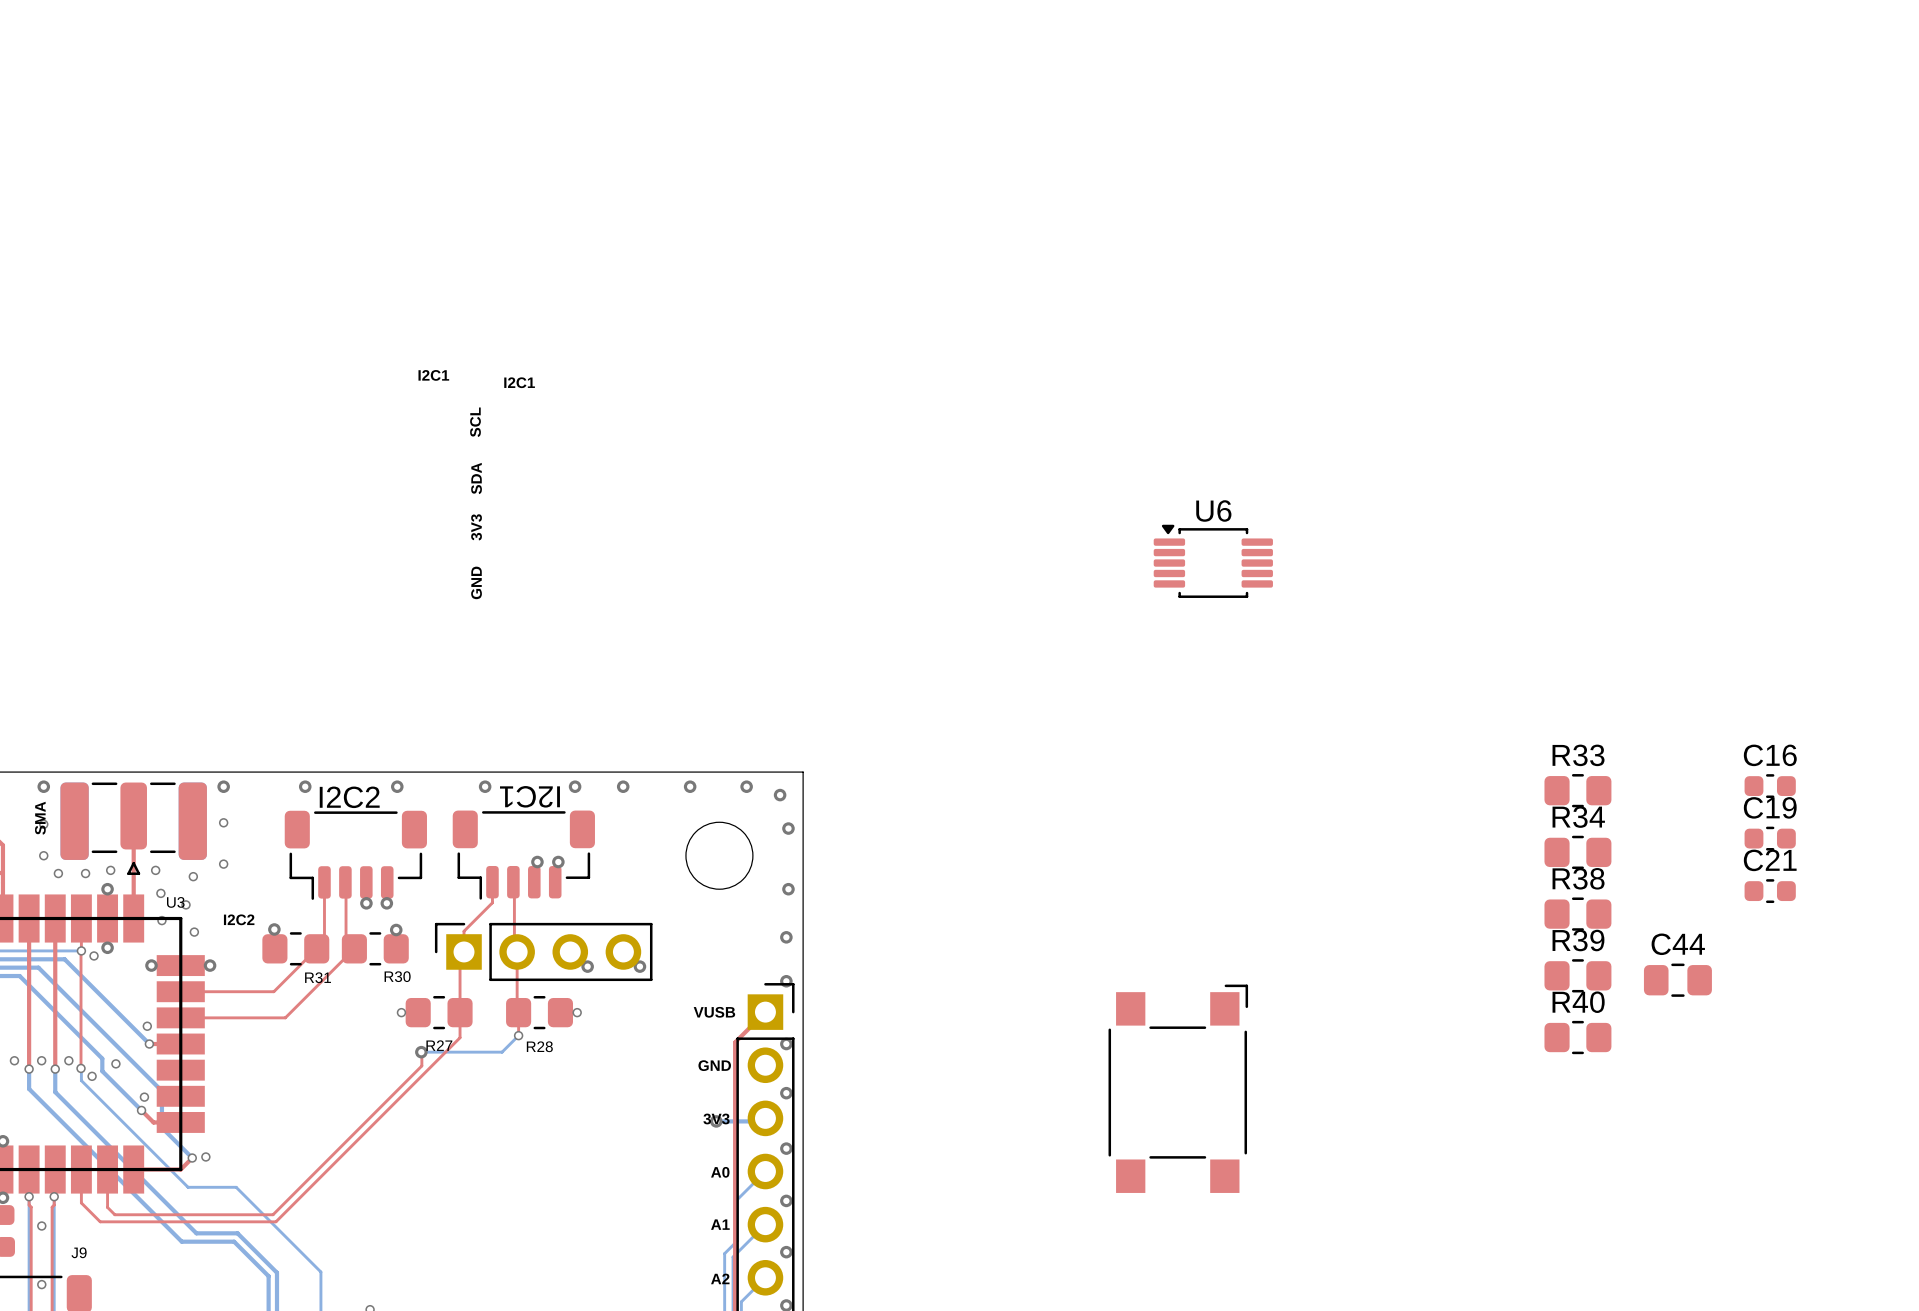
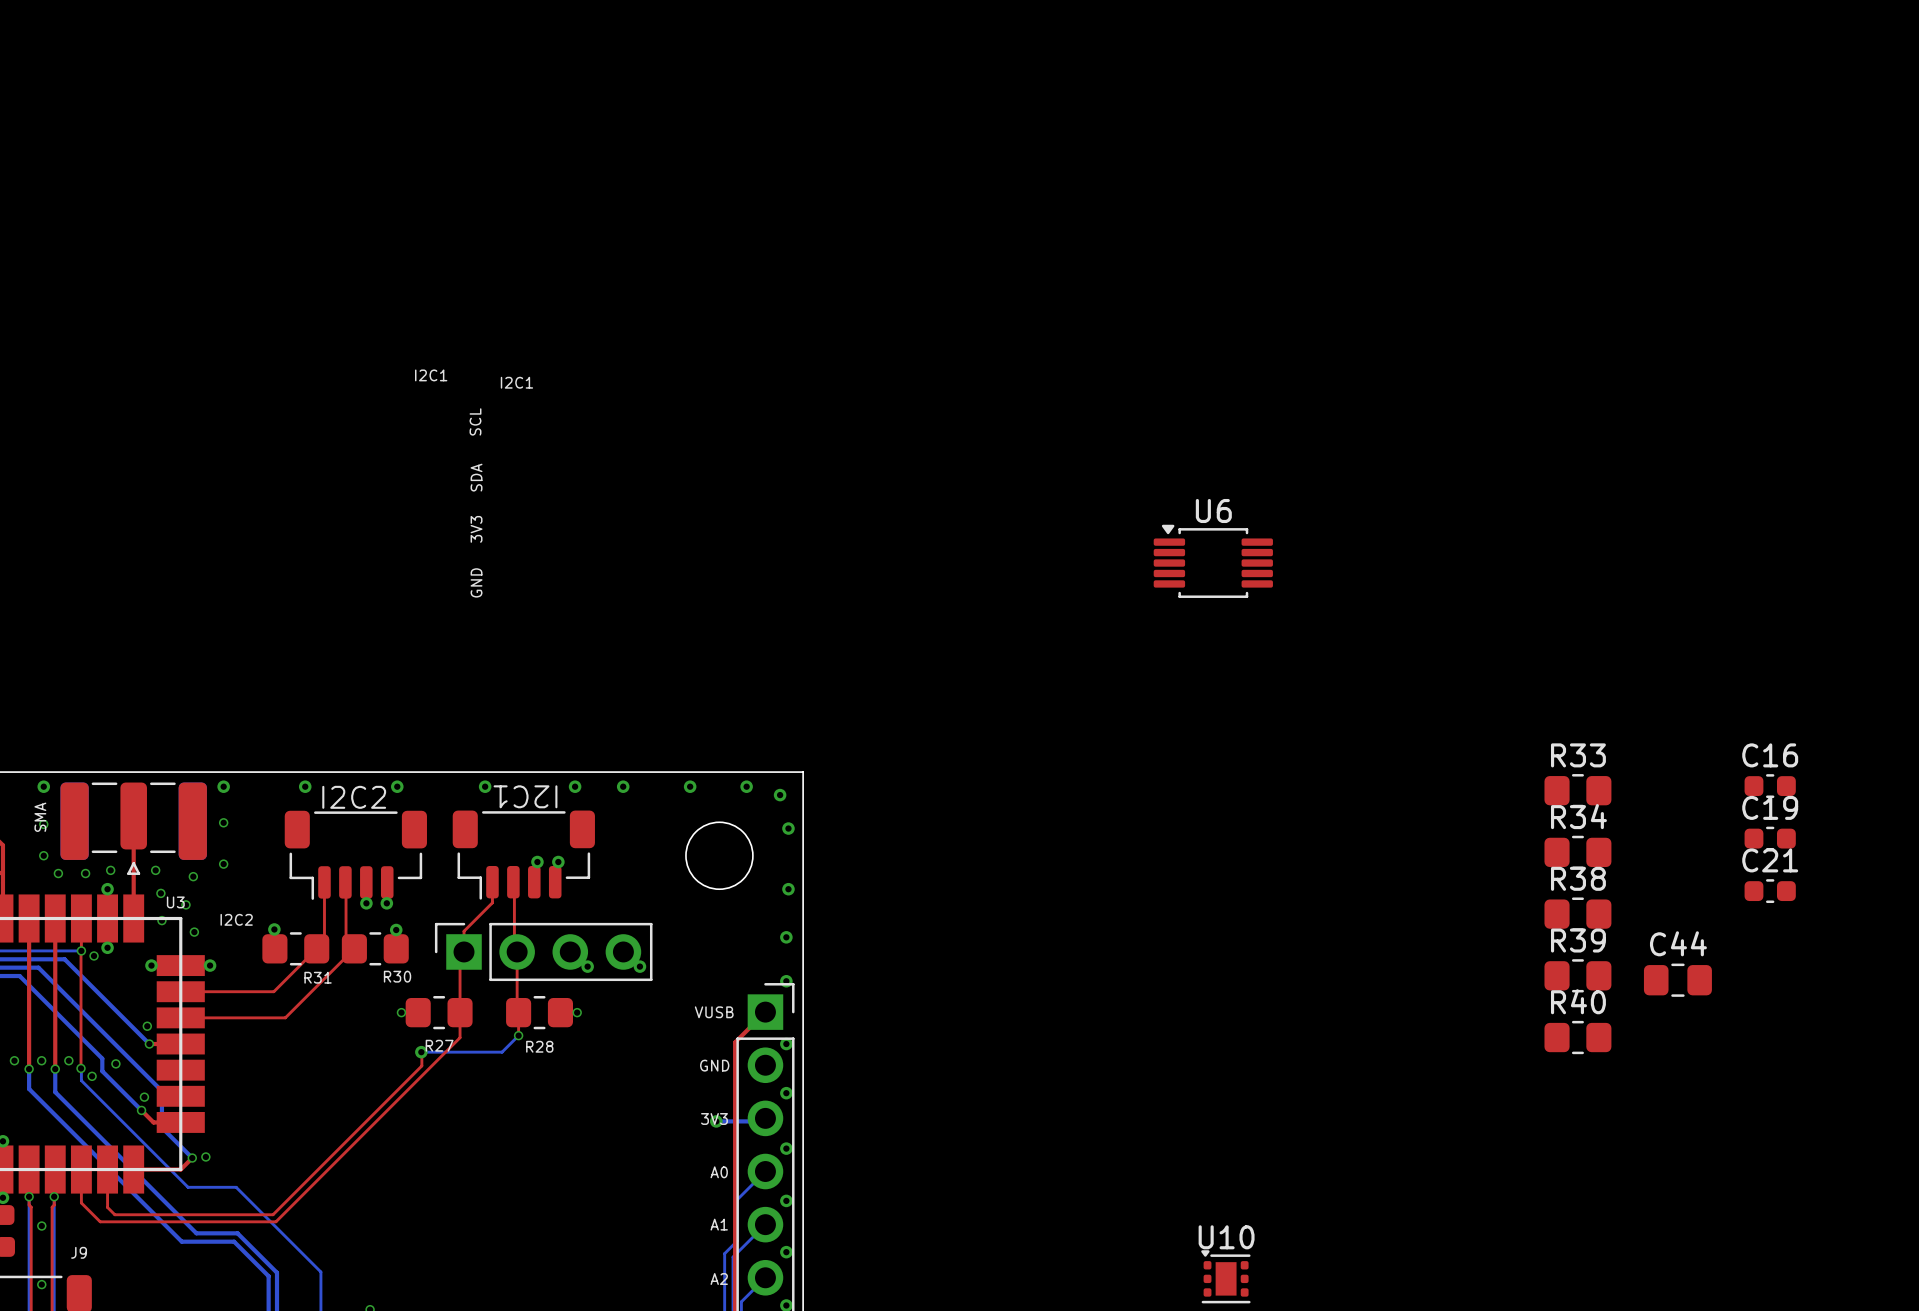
part: (1178, 1088) -> none
U10: none -> (1225, 1276)

